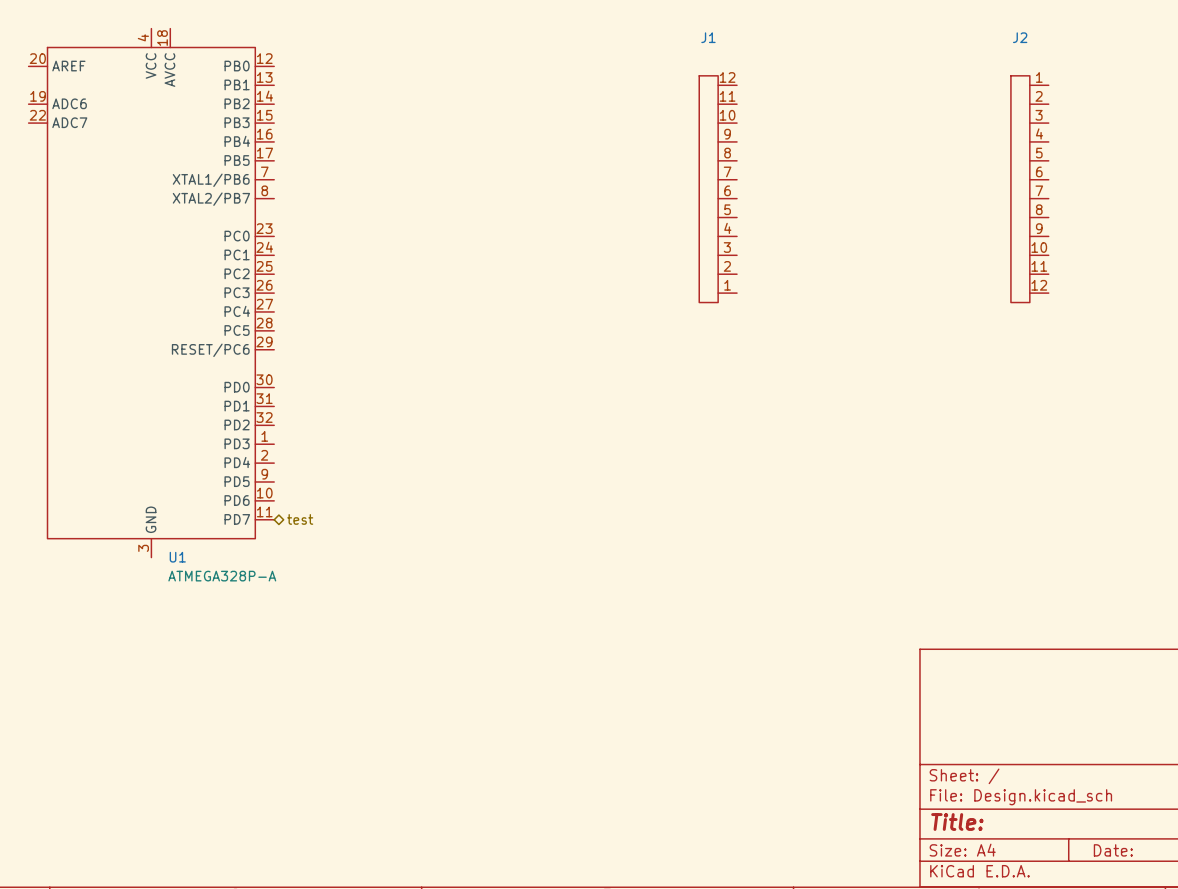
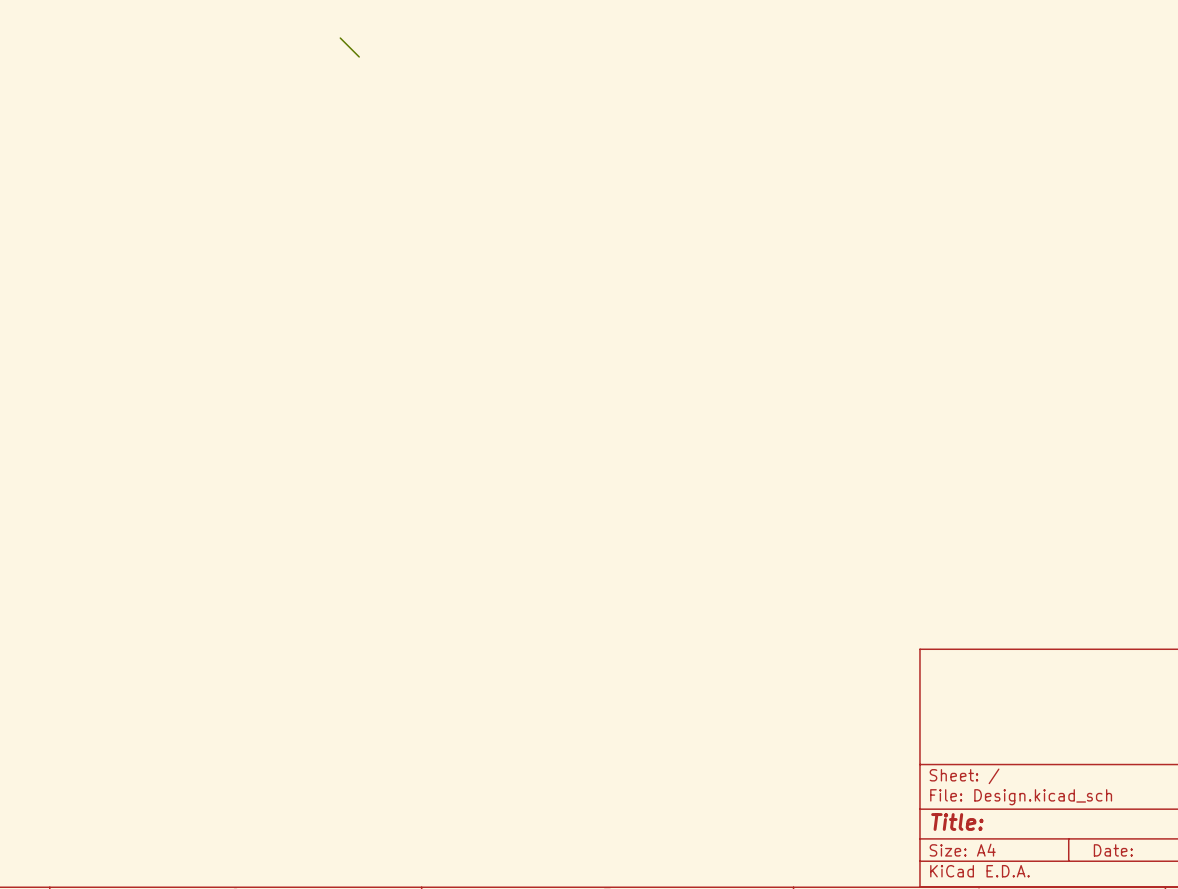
wire: none -> (340, 38) (359, 56)
J1: (718, 189) -> none
J2: (1029, 189) -> none
U1: ATMEGA328P-A (151, 293) -> none
hierarchical label: test (300, 519) -> none

